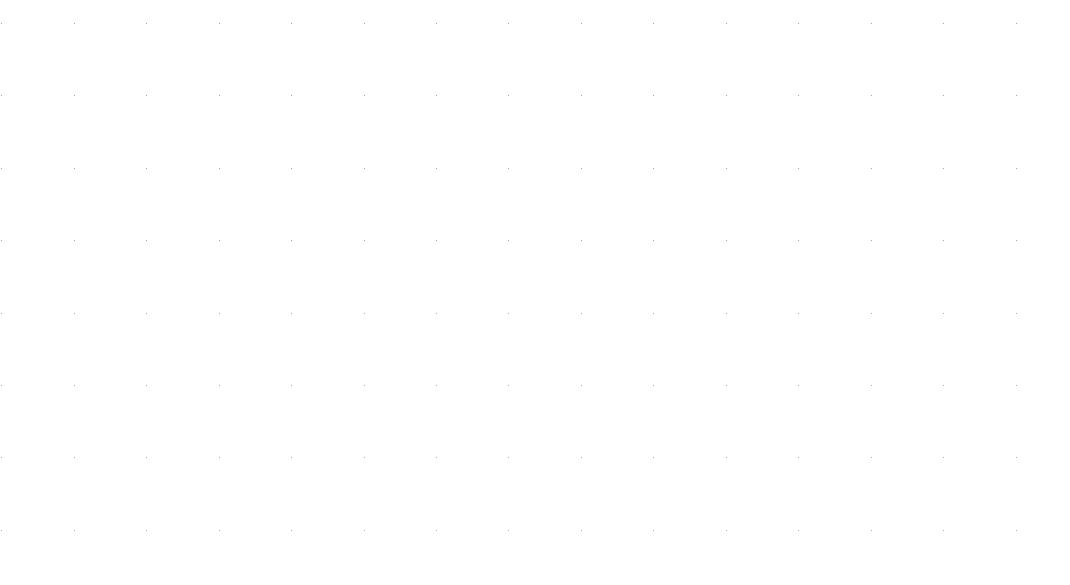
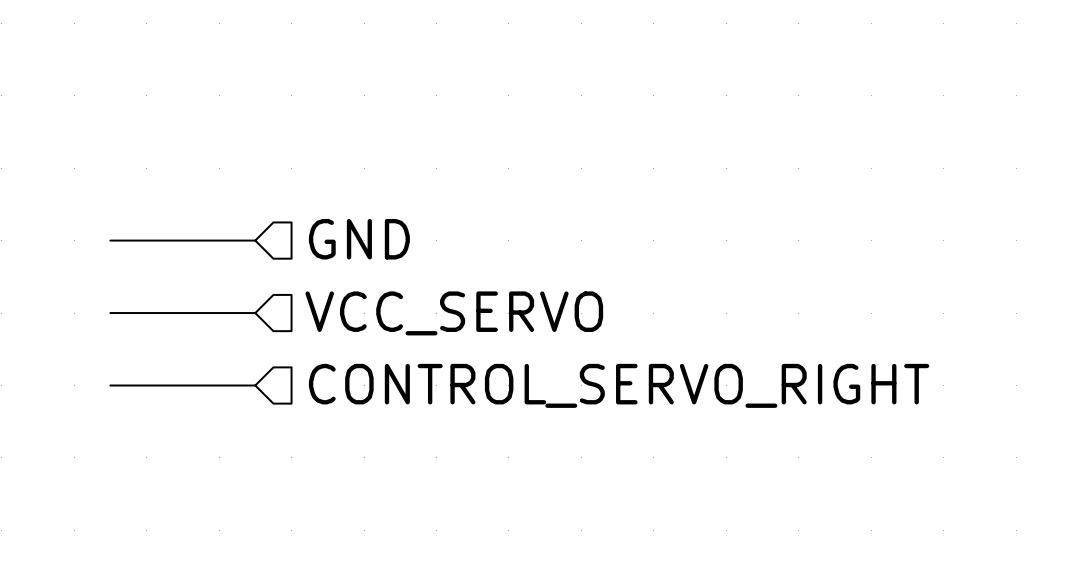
hierarchical label: none -> GND (359, 239)
wire: none -> (110, 240) (255, 240)
wire: none -> (110, 313) (255, 313)
hierarchical label: none -> VCC_SERVO (454, 313)
wire: none -> (110, 385) (255, 385)
hierarchical label: none -> CONTROL_SERVO_RIGHT (619, 385)

